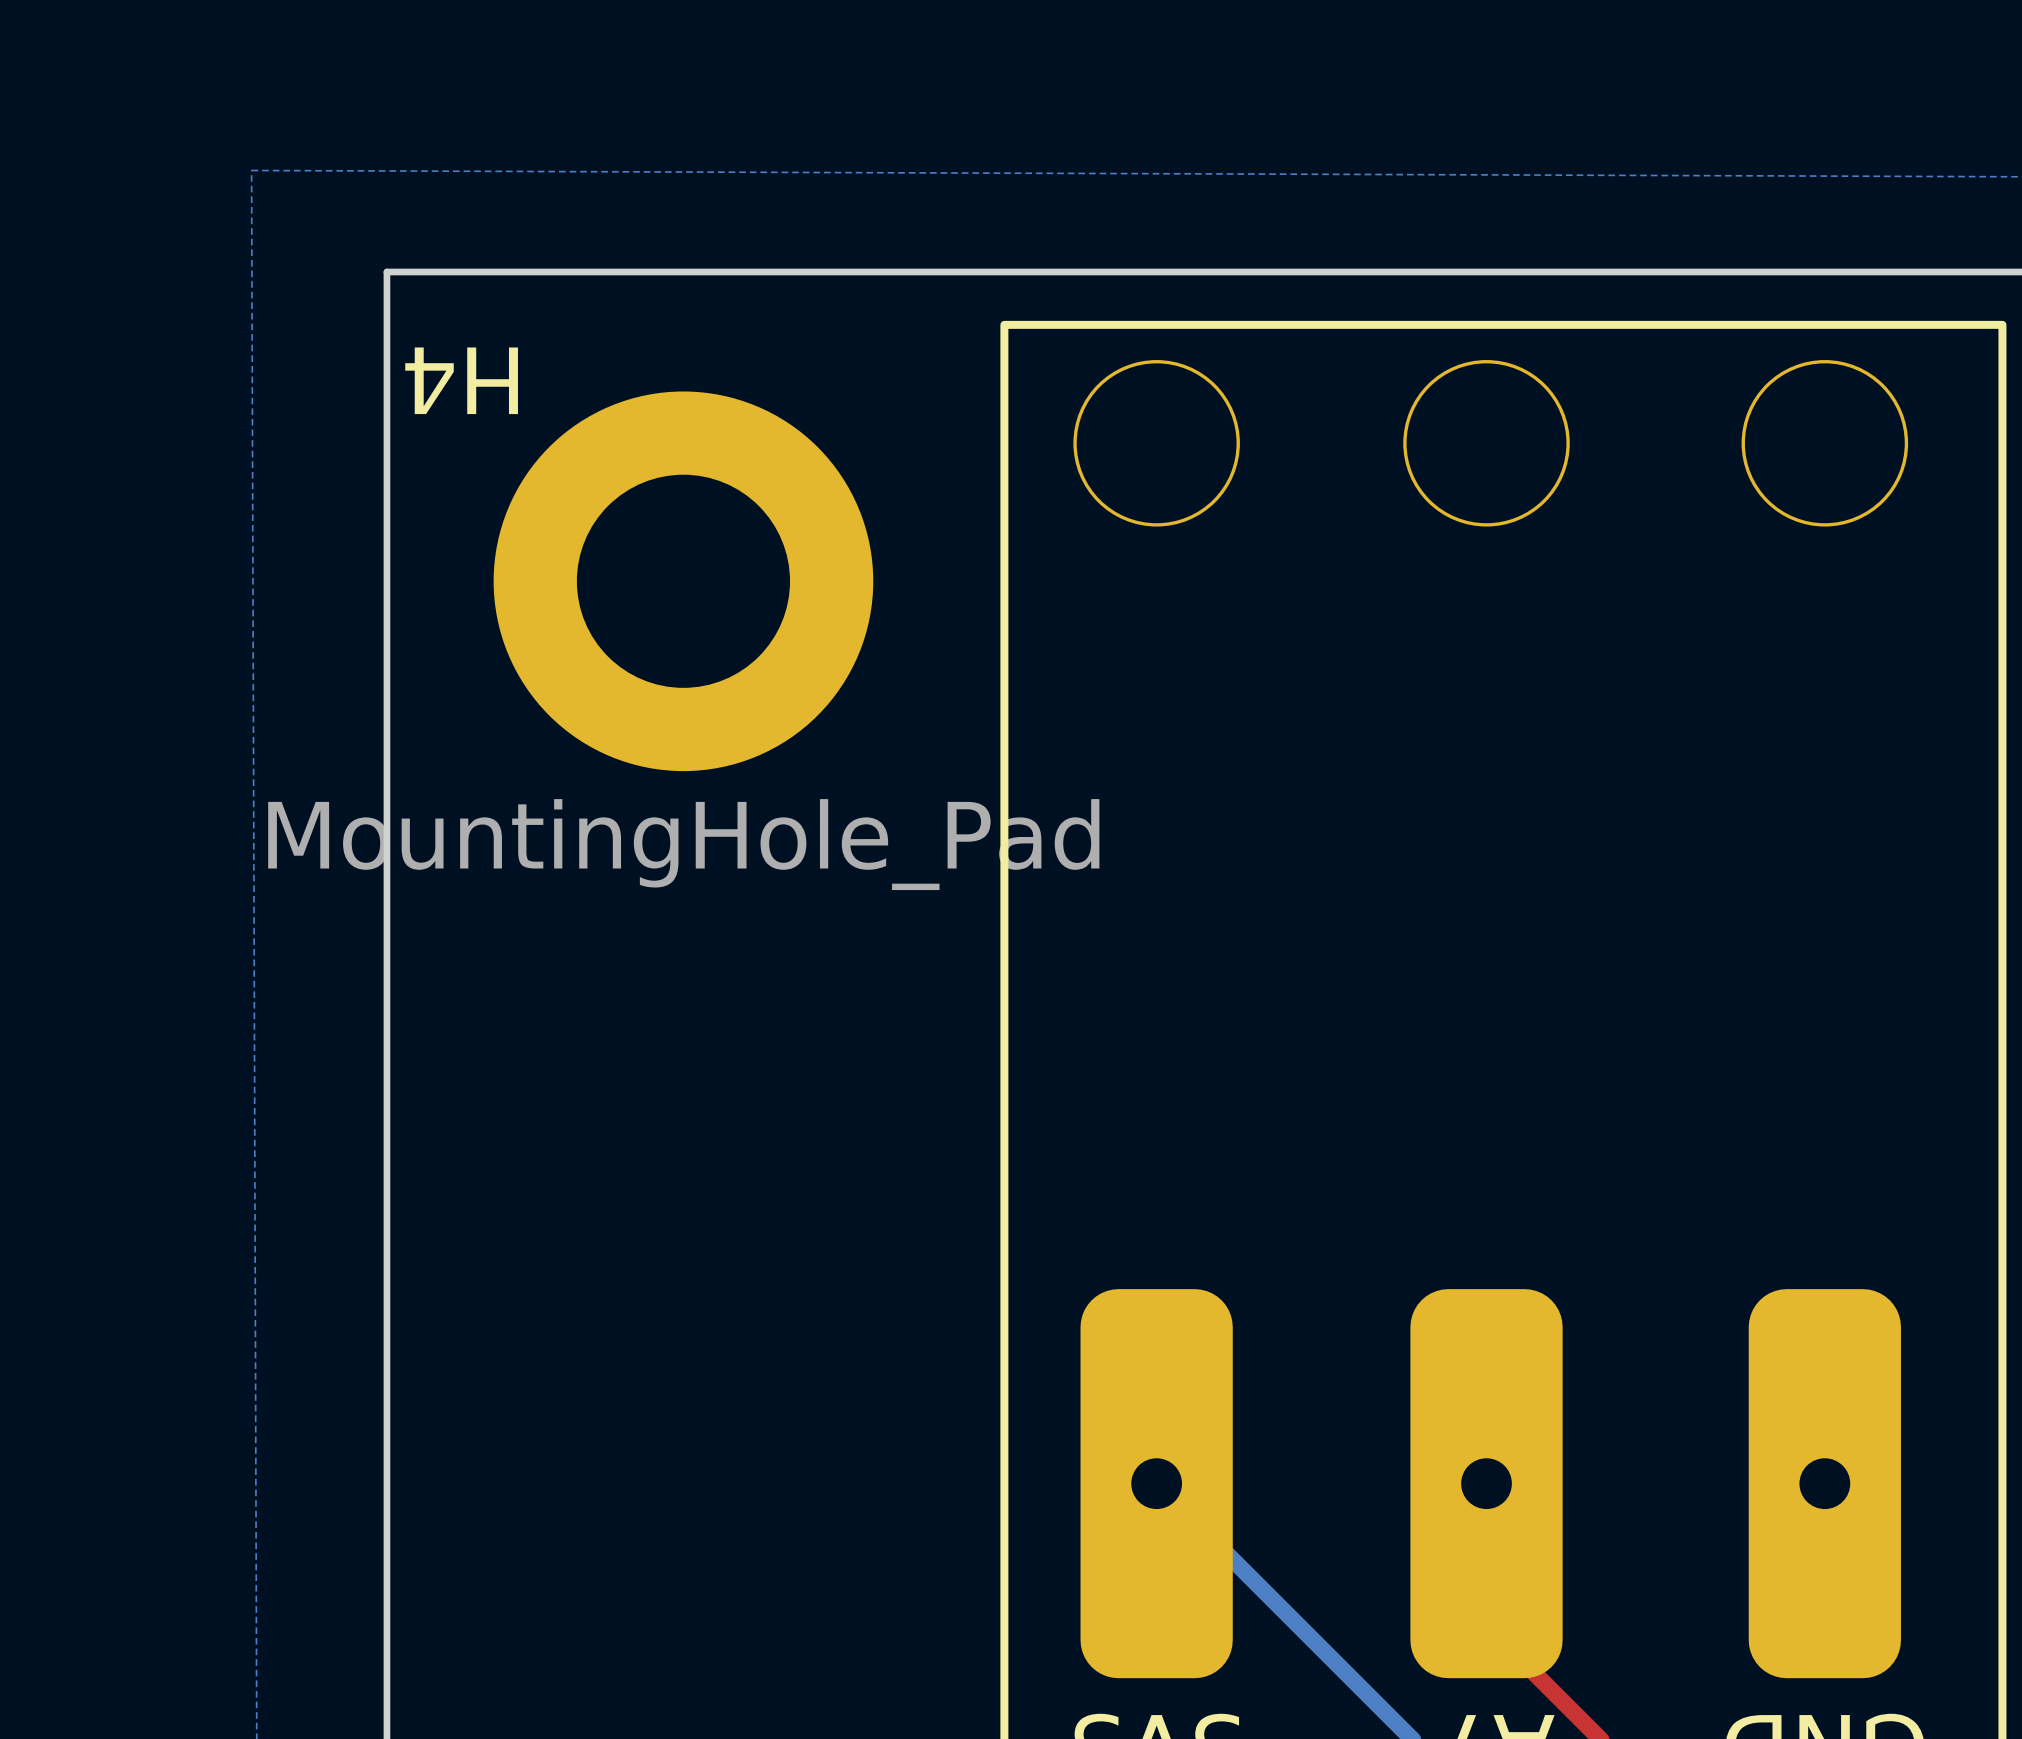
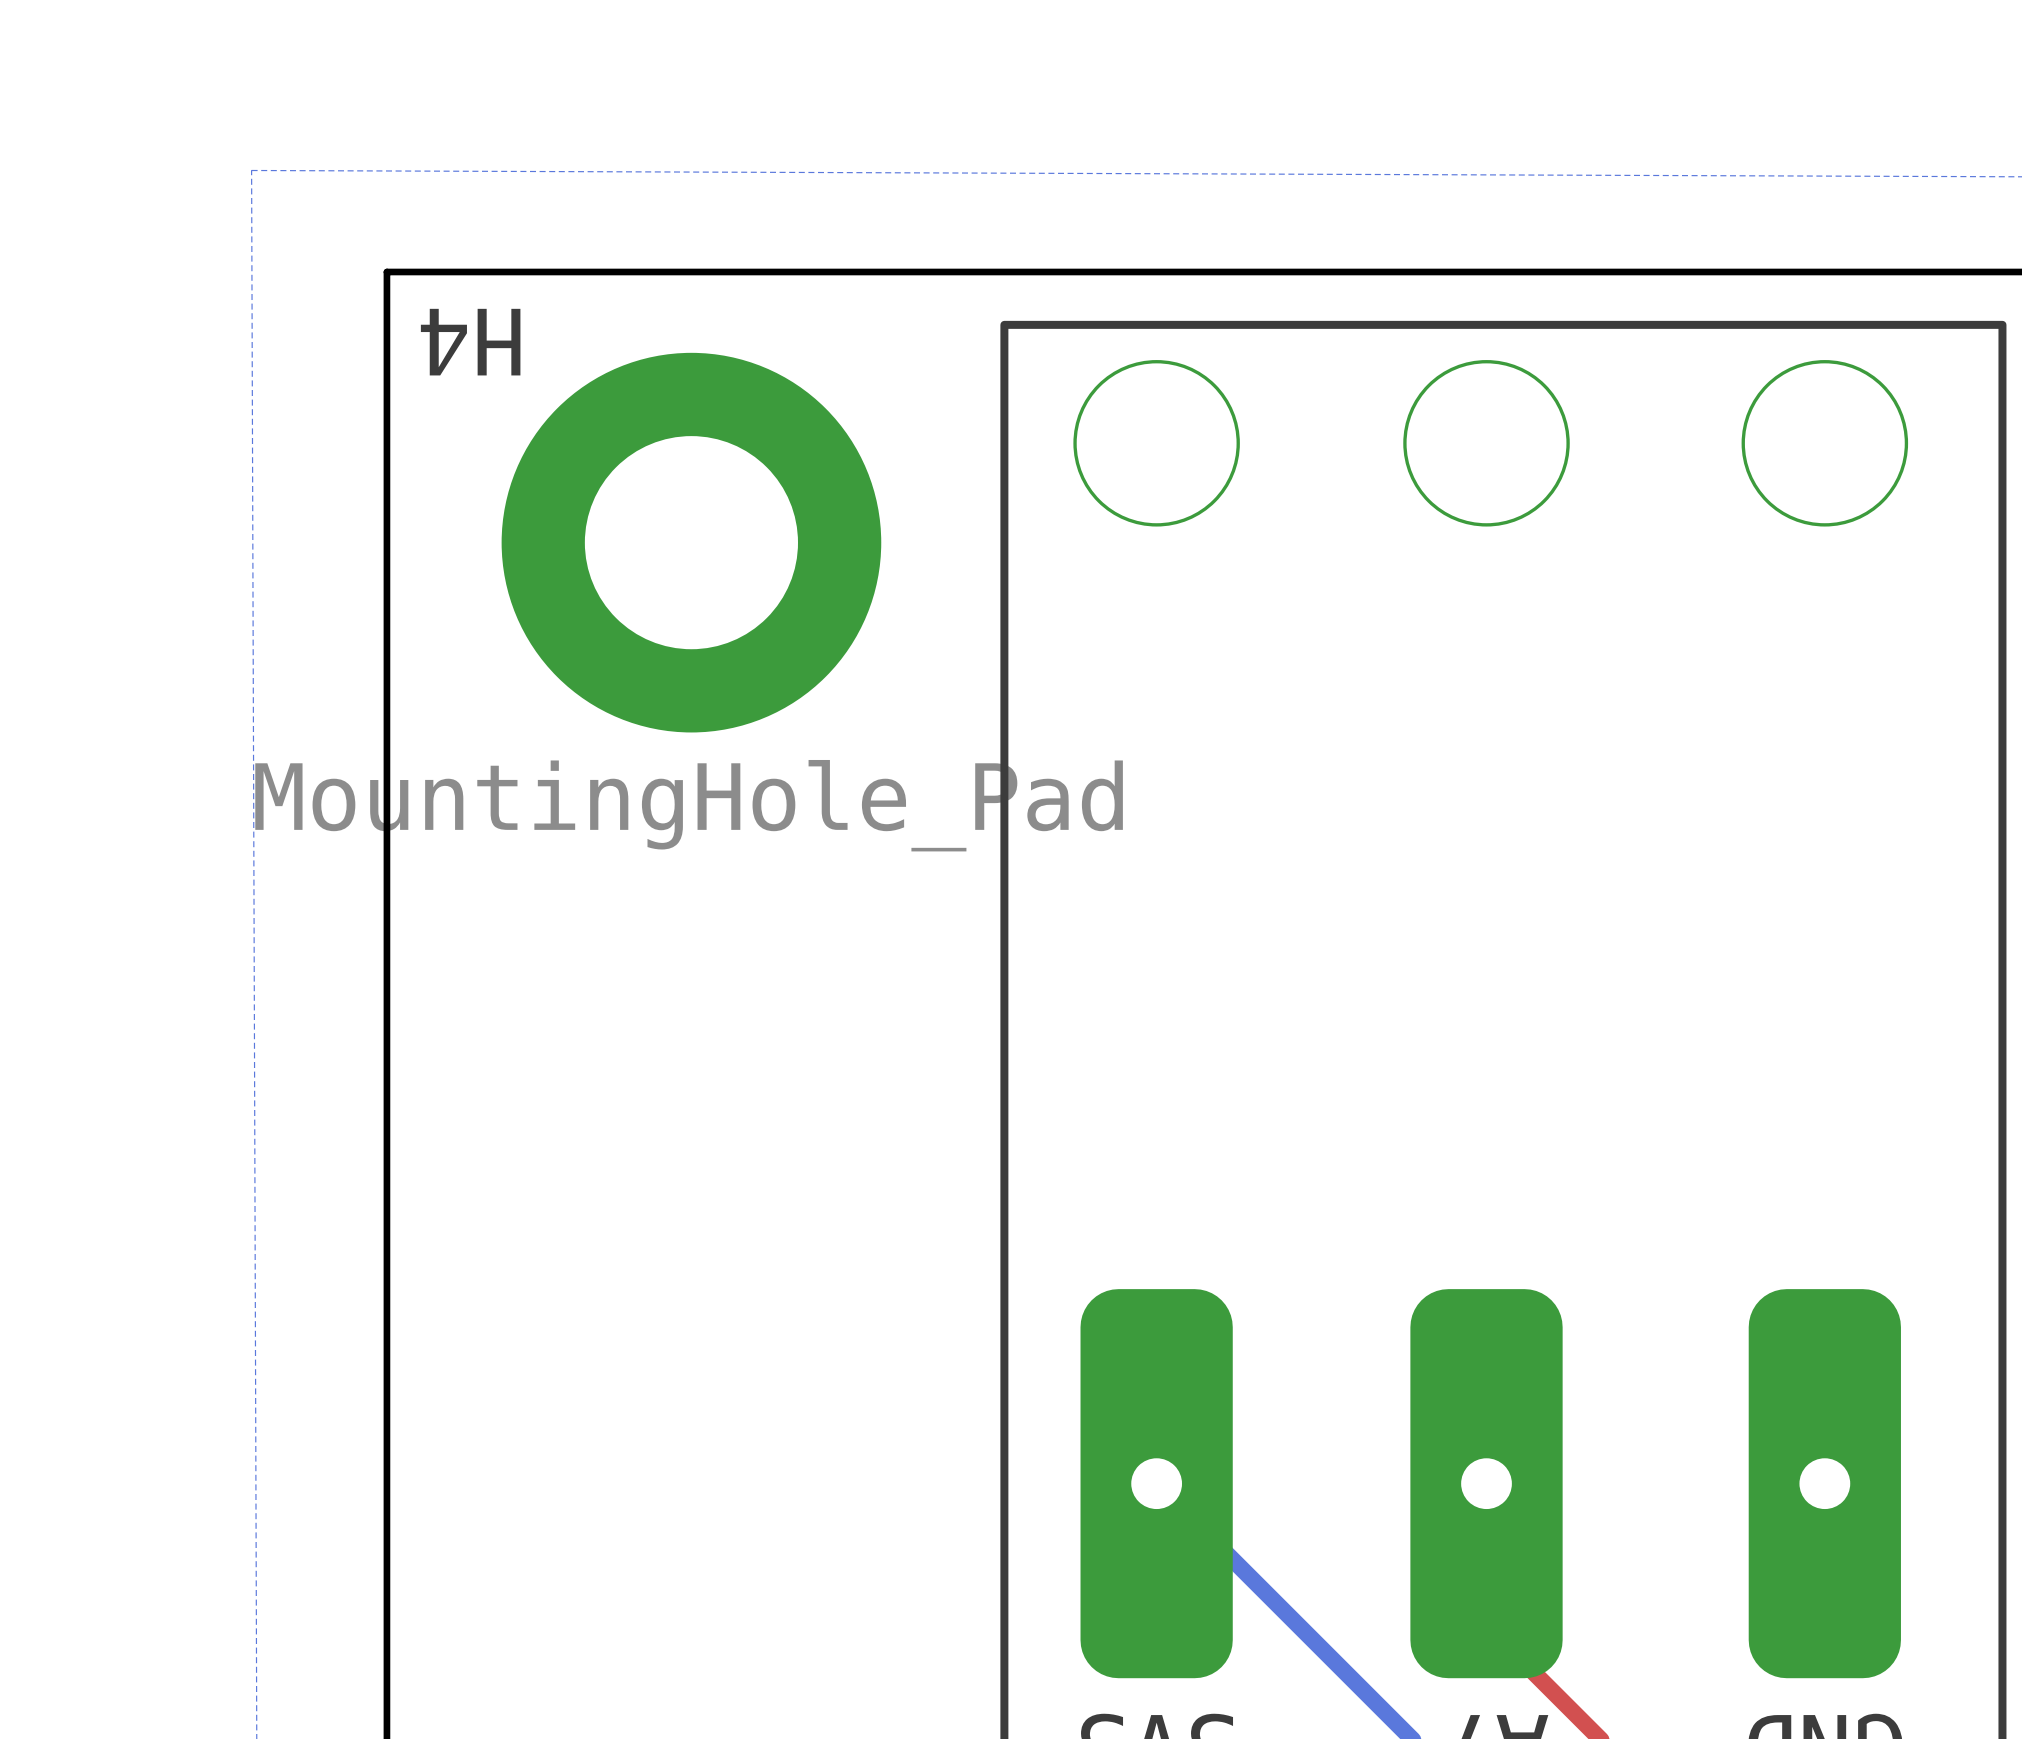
H4 position: (683, 581) -> (691, 542)

